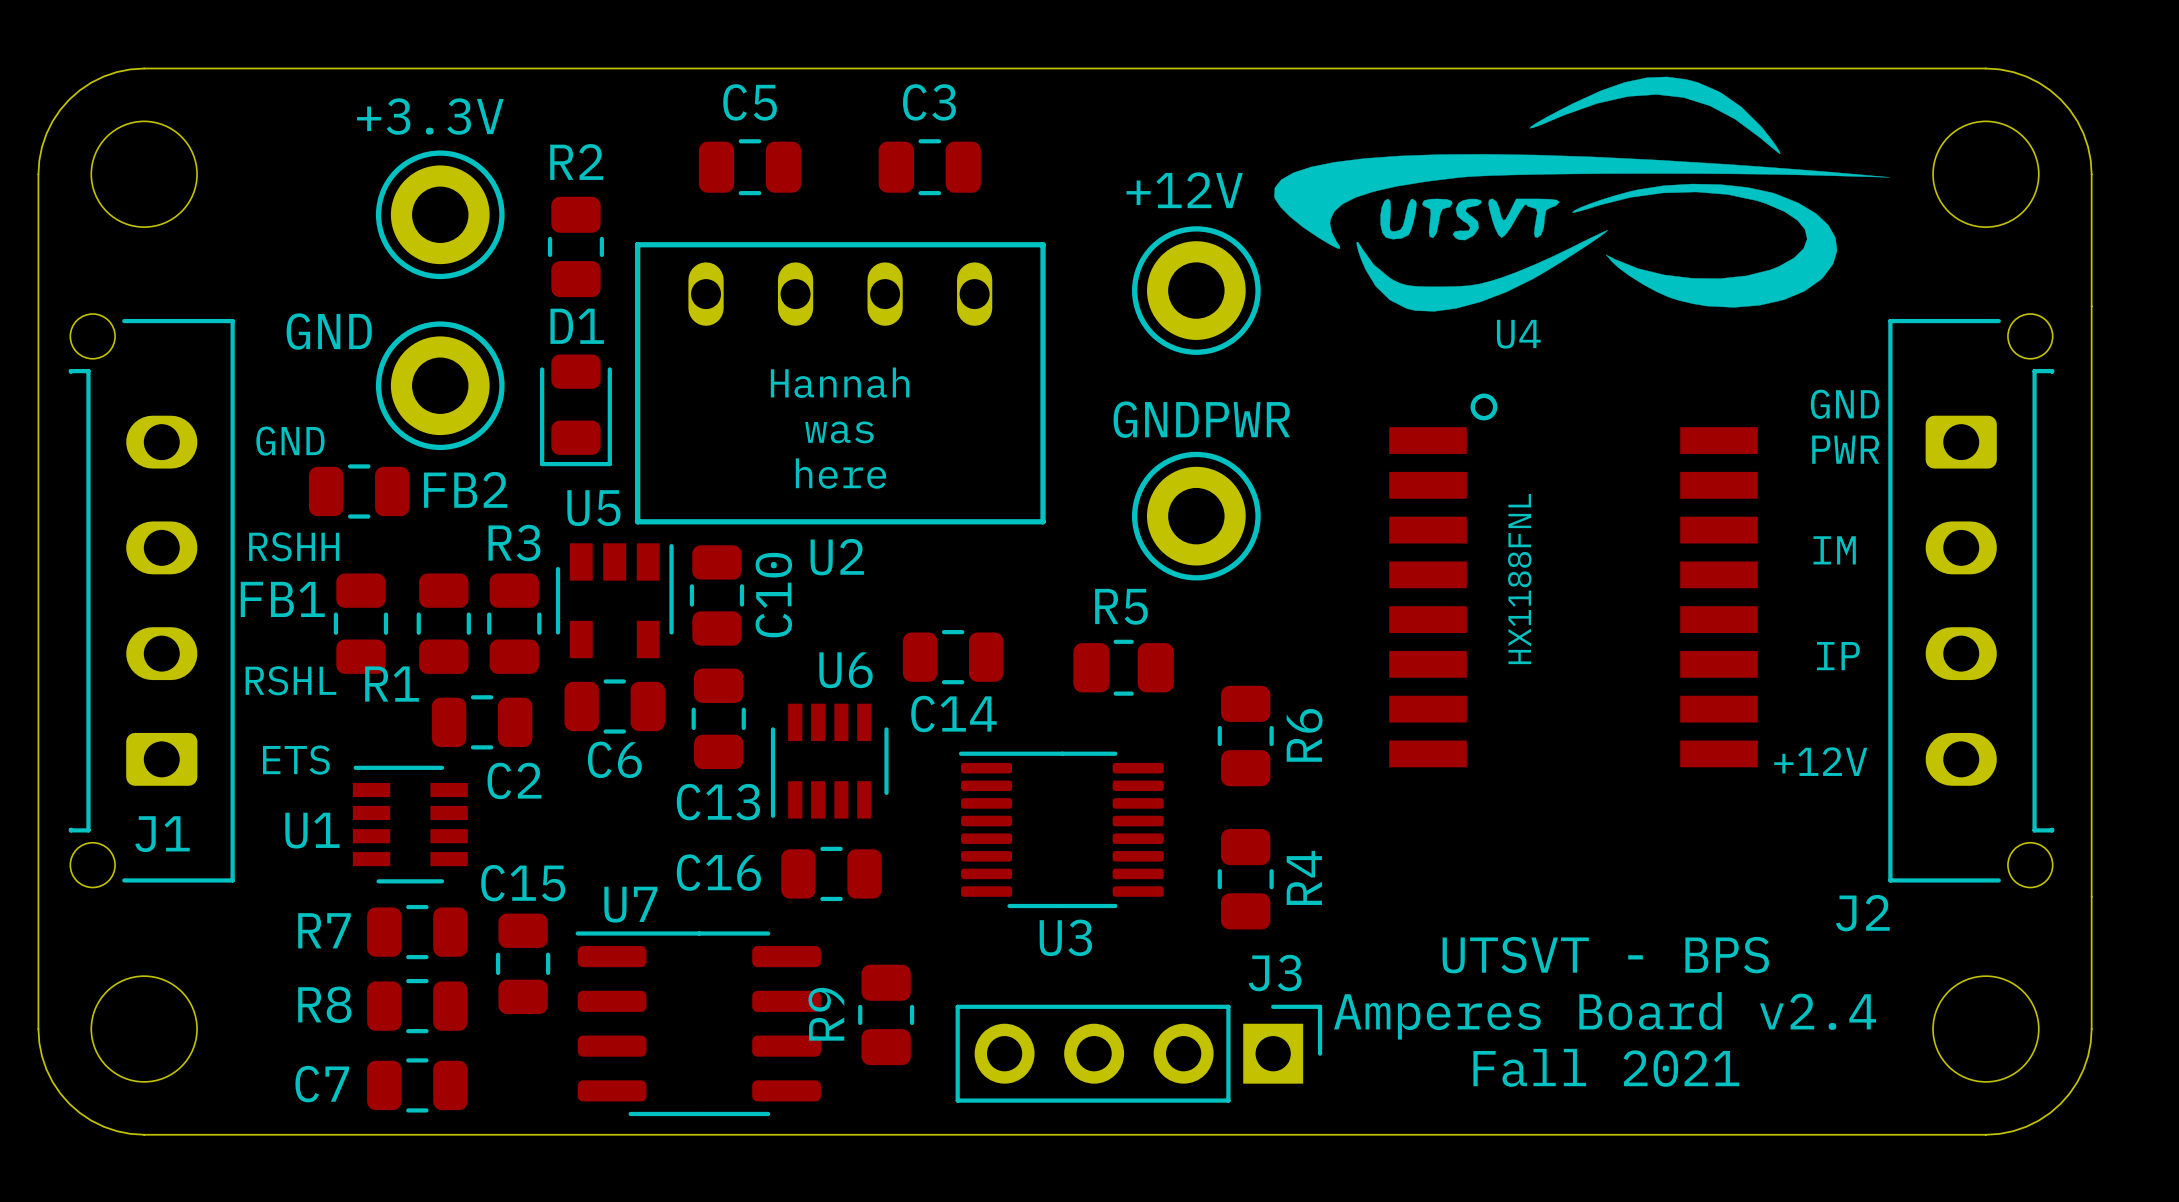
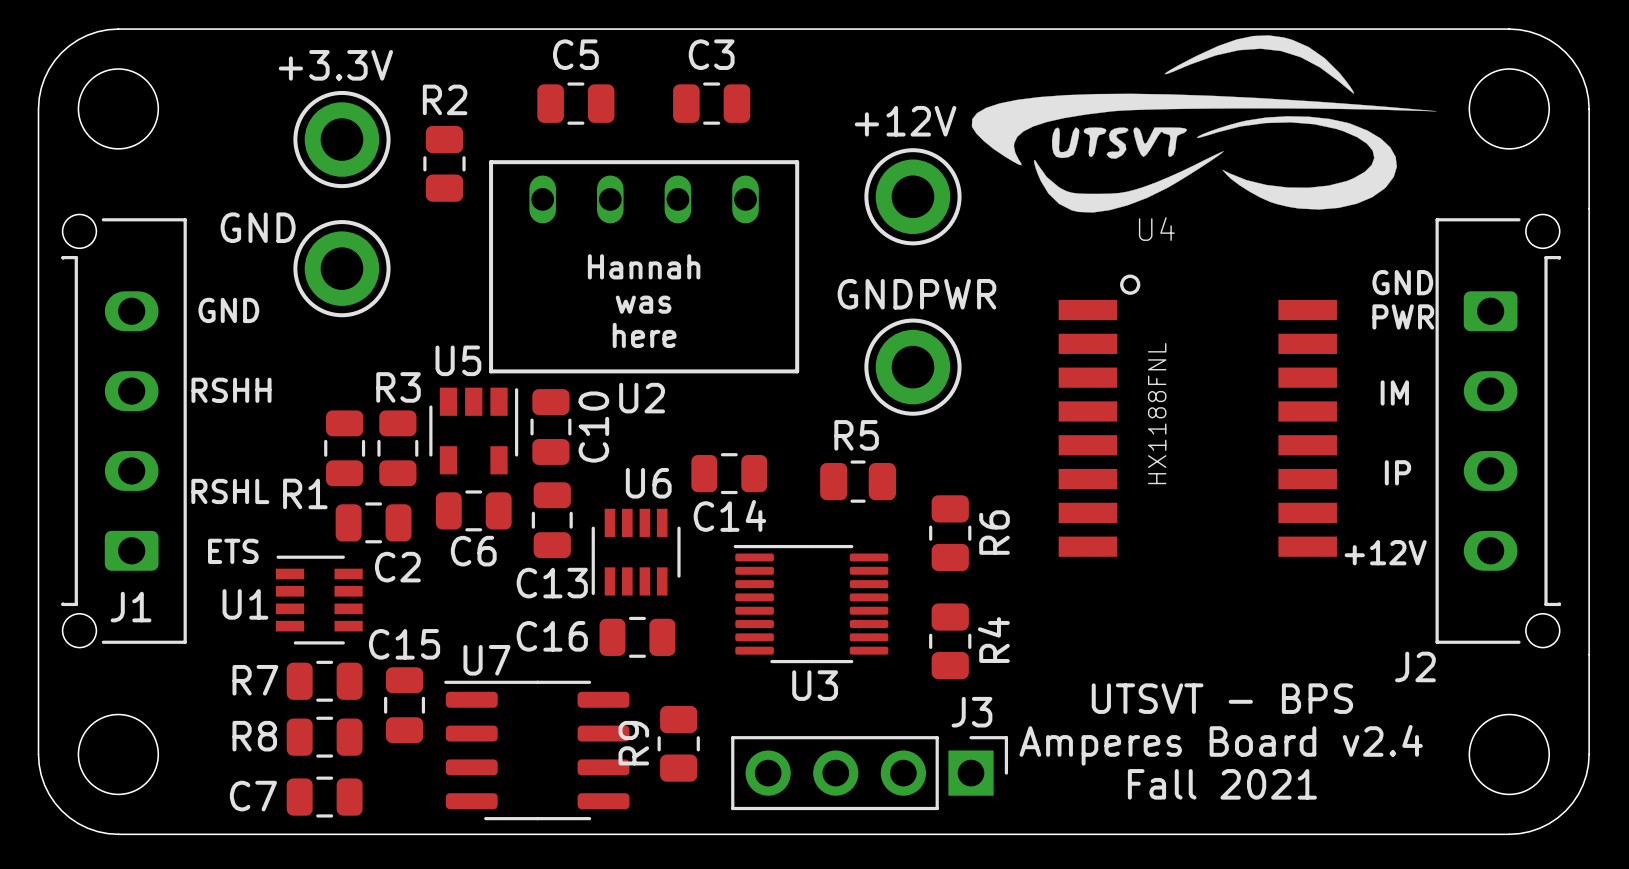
D1: (575, 410) -> none
FB2: (359, 491) -> none
FB1: (360, 623) -> none

